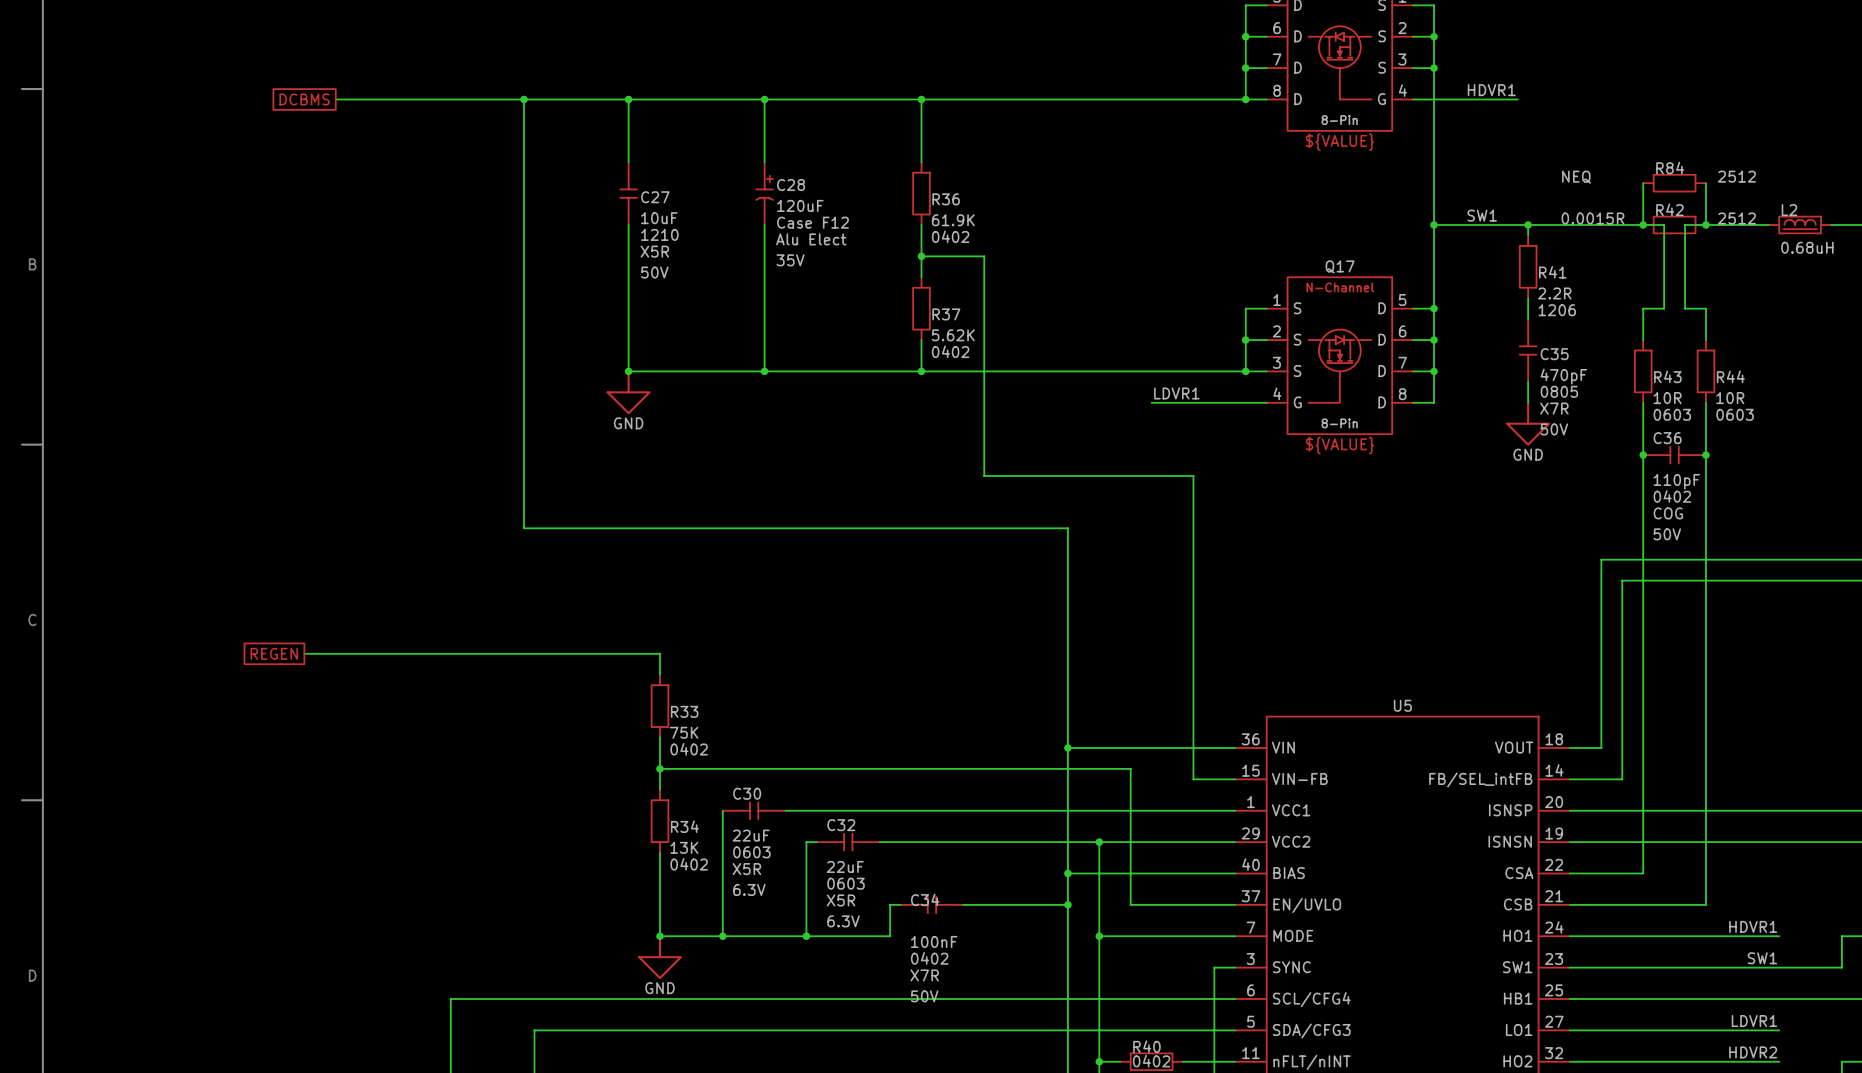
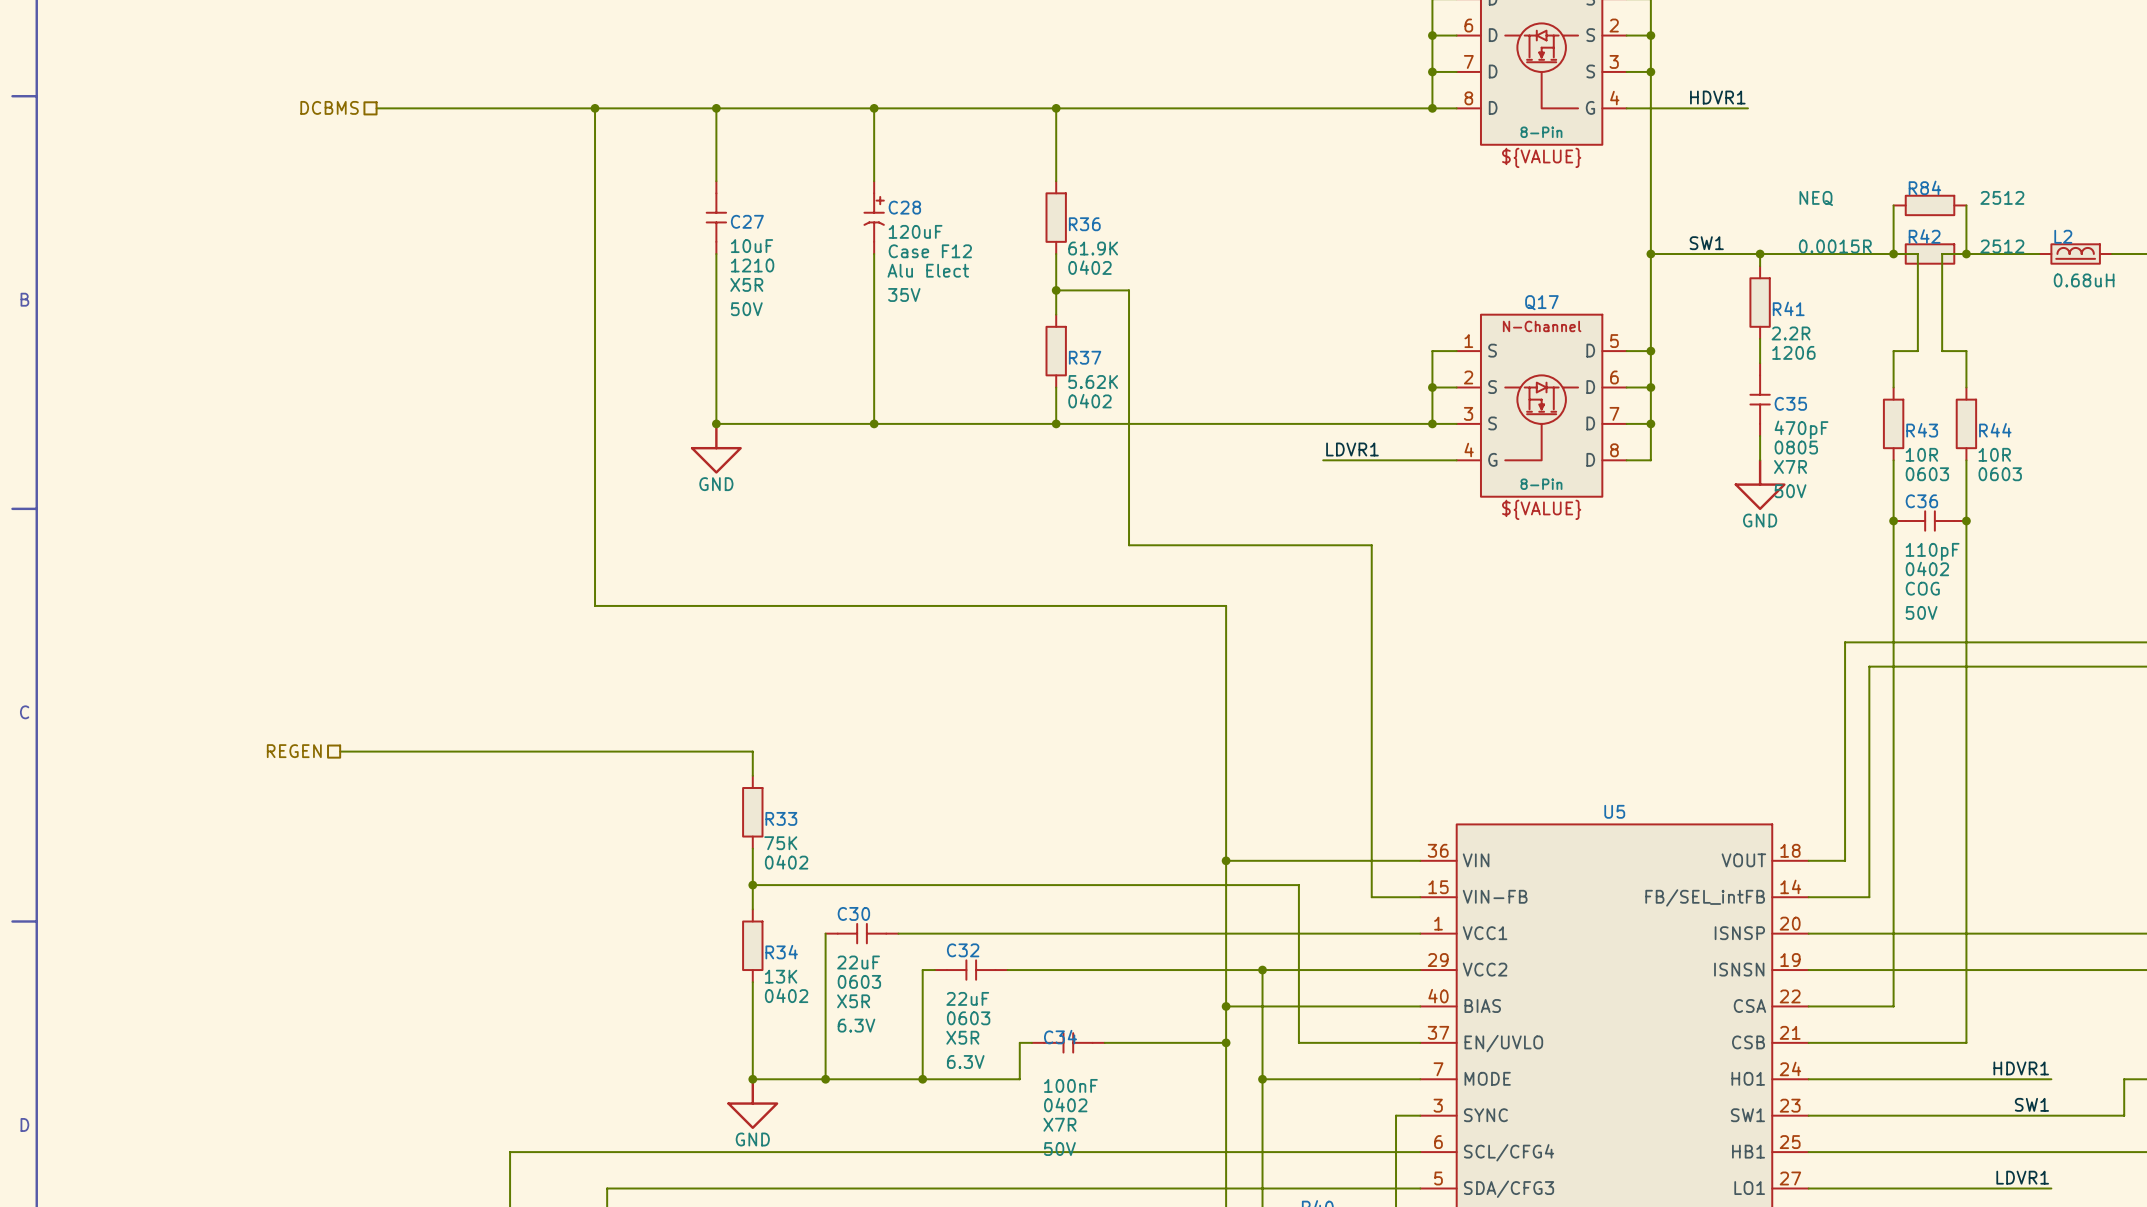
hierarchical label: none -> DCBMS (329, 107)
global label: DCBMS (304, 99) -> none
hierarchical label: none -> REGEN (294, 751)
global label: REGEN (274, 653) -> none

